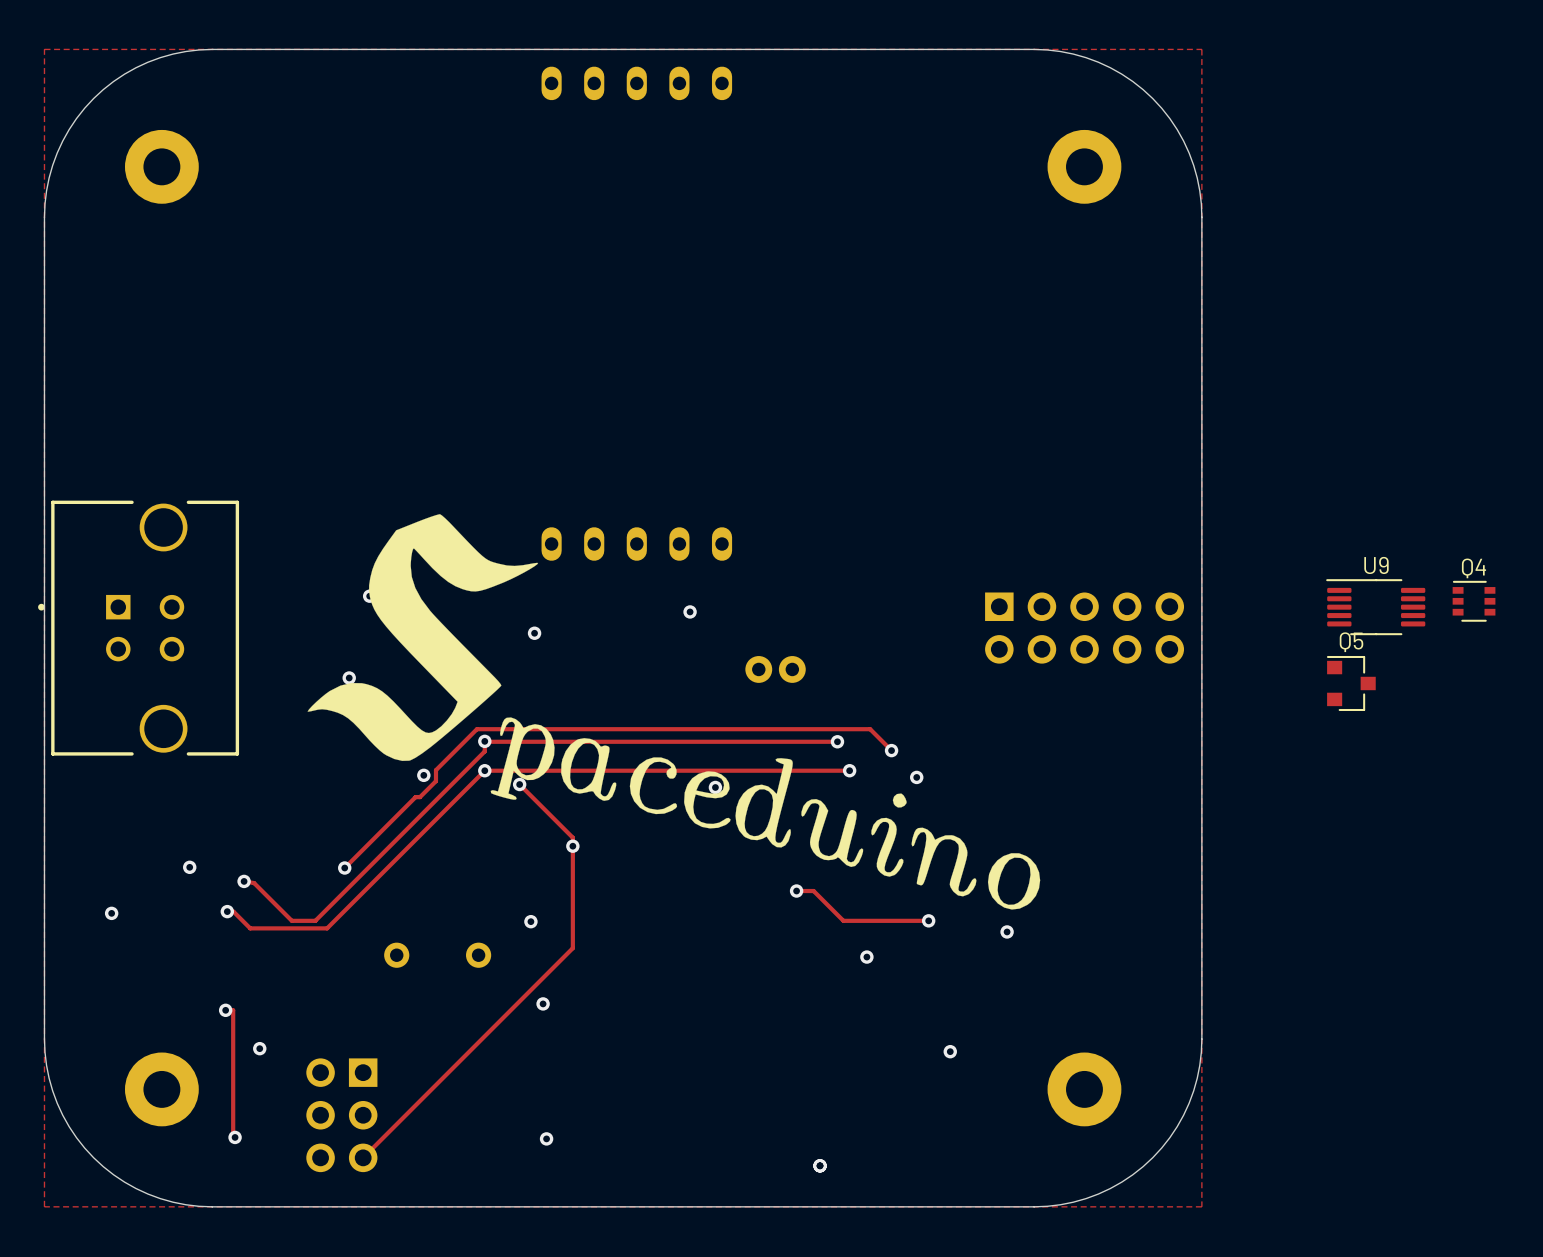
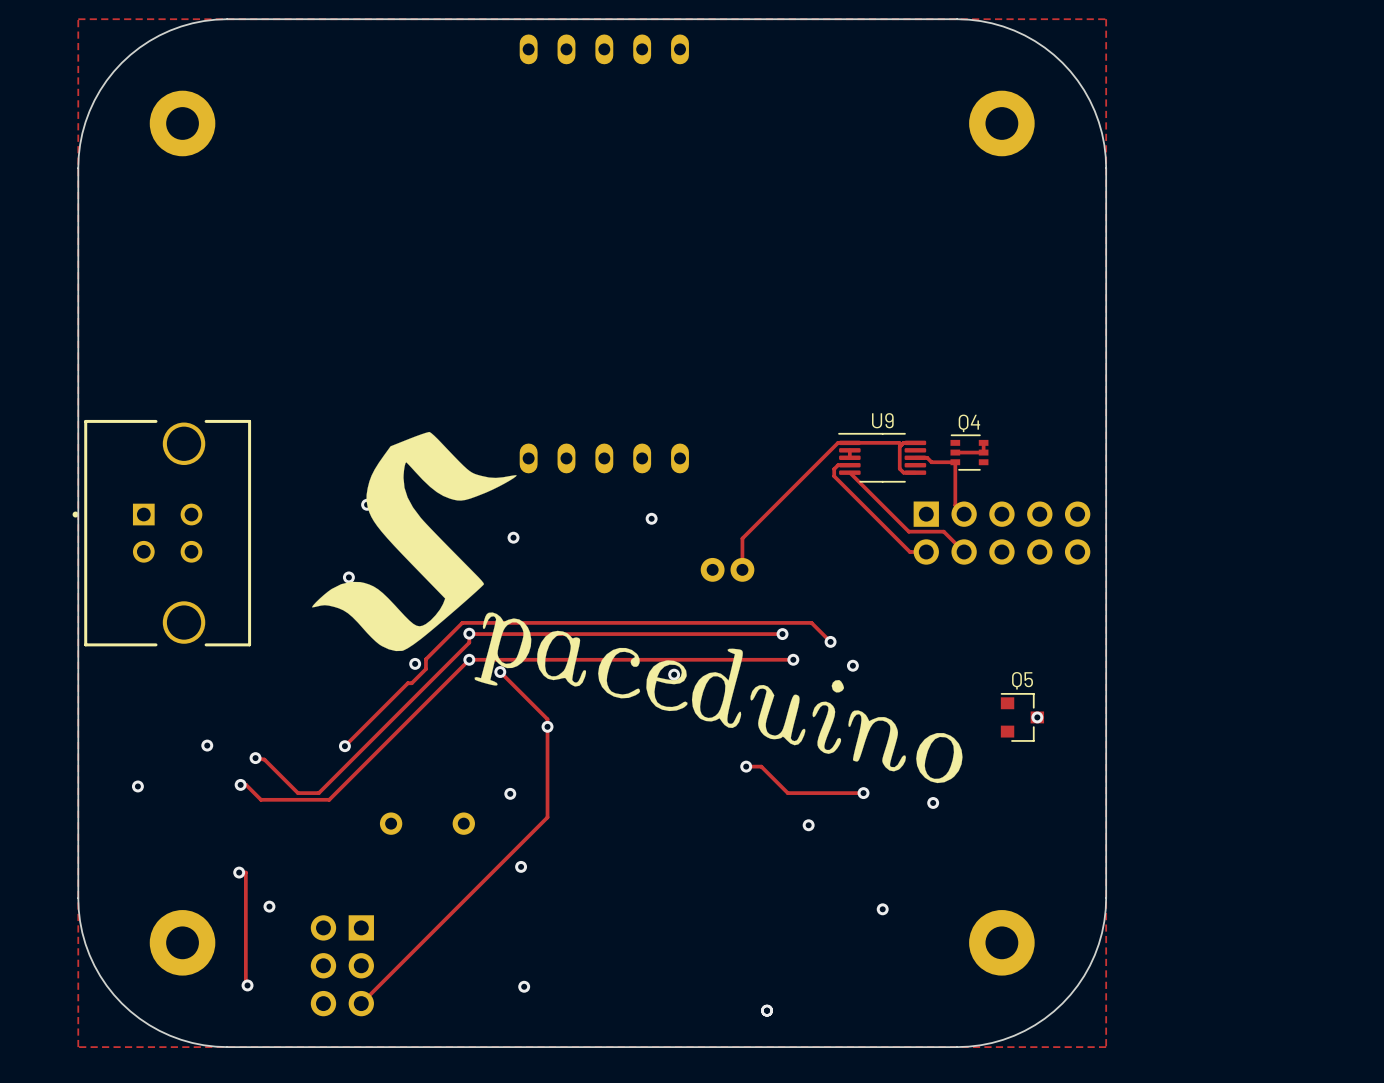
track: none -> (915, 442) (903, 442) (899, 446) (899, 468) (903, 472) (915, 472)
track: none -> (983, 442) (983, 452) (955, 452)
track: none -> (901, 445) (899, 442) (838, 442) (742, 538) (742, 569)
track: none -> (849, 450) (849, 457)
track: none -> (915, 457) (927, 457) (931, 462) (955, 462) (955, 505) (964, 514)
track: none -> (849, 465) (838, 465) (834, 469) (834, 476) (909, 552) (926, 552)
track: none -> (849, 472) (908, 531) (943, 531) (964, 552)
Q4 position: (1474, 601) -> (969, 452)
U9 position: (1375, 607) -> (882, 457)
Q5 position: (1351, 683) -> (1022, 717)
via: none -> (1037, 717)

